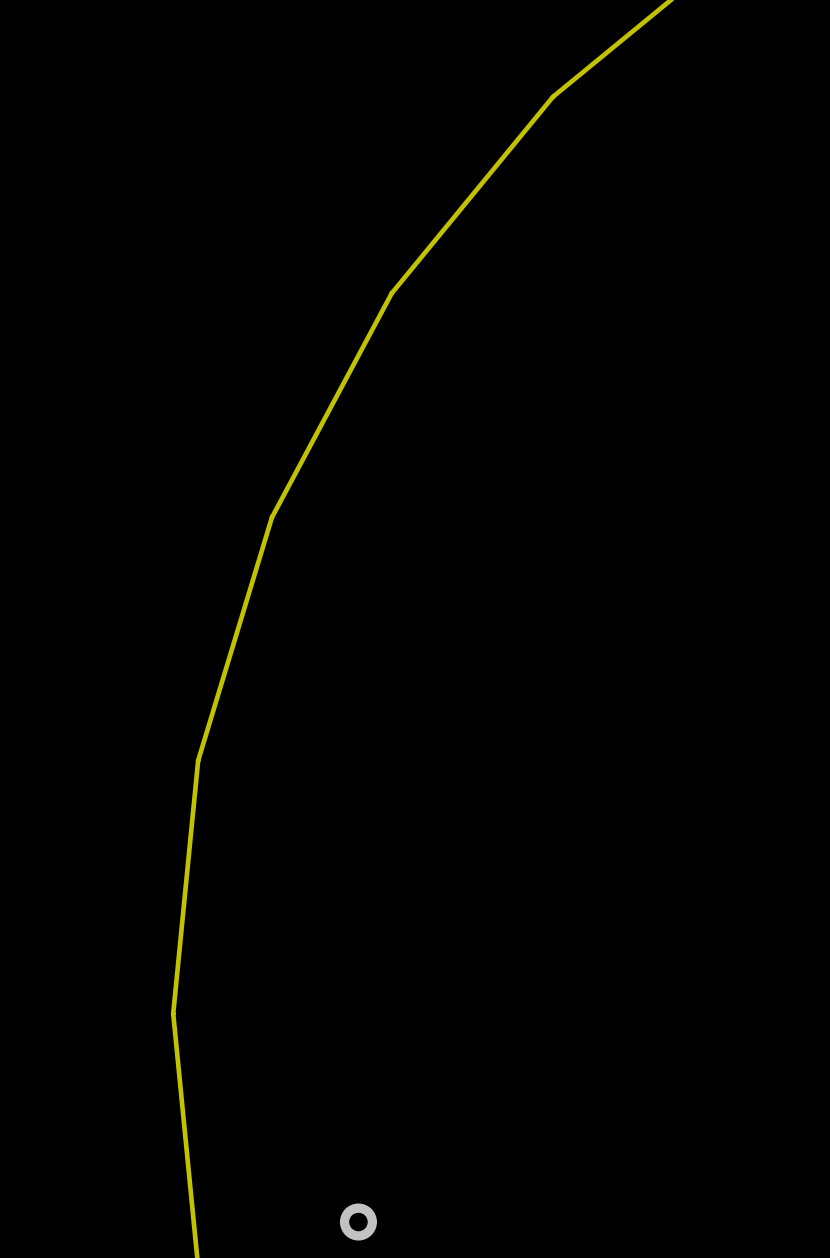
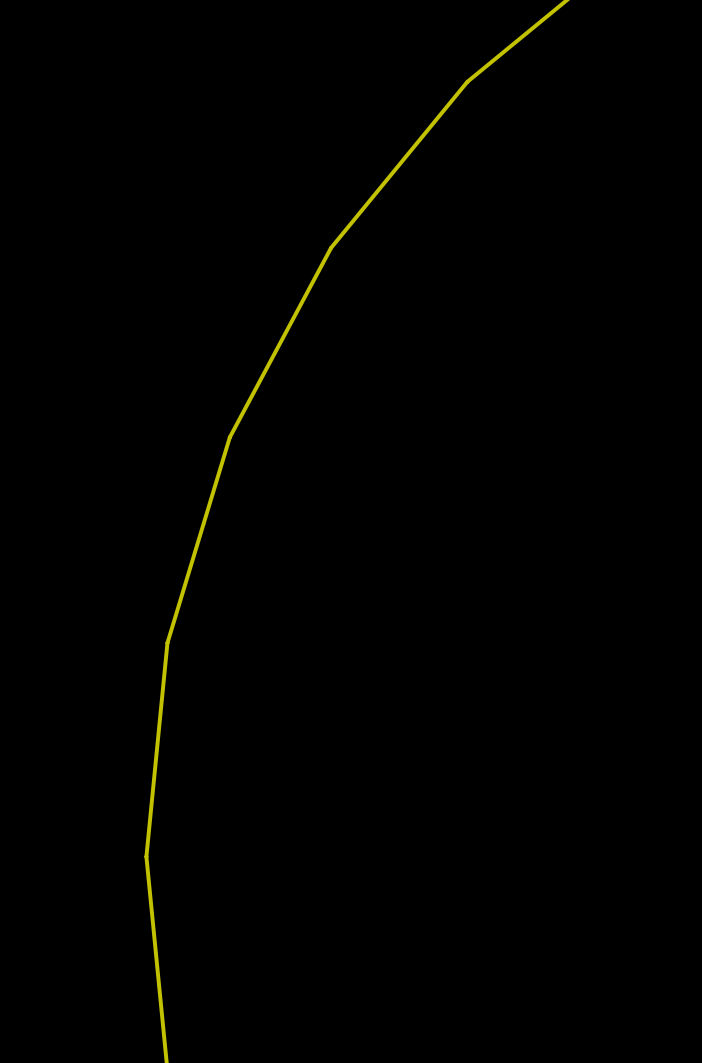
via: (358, 1222) -> none

